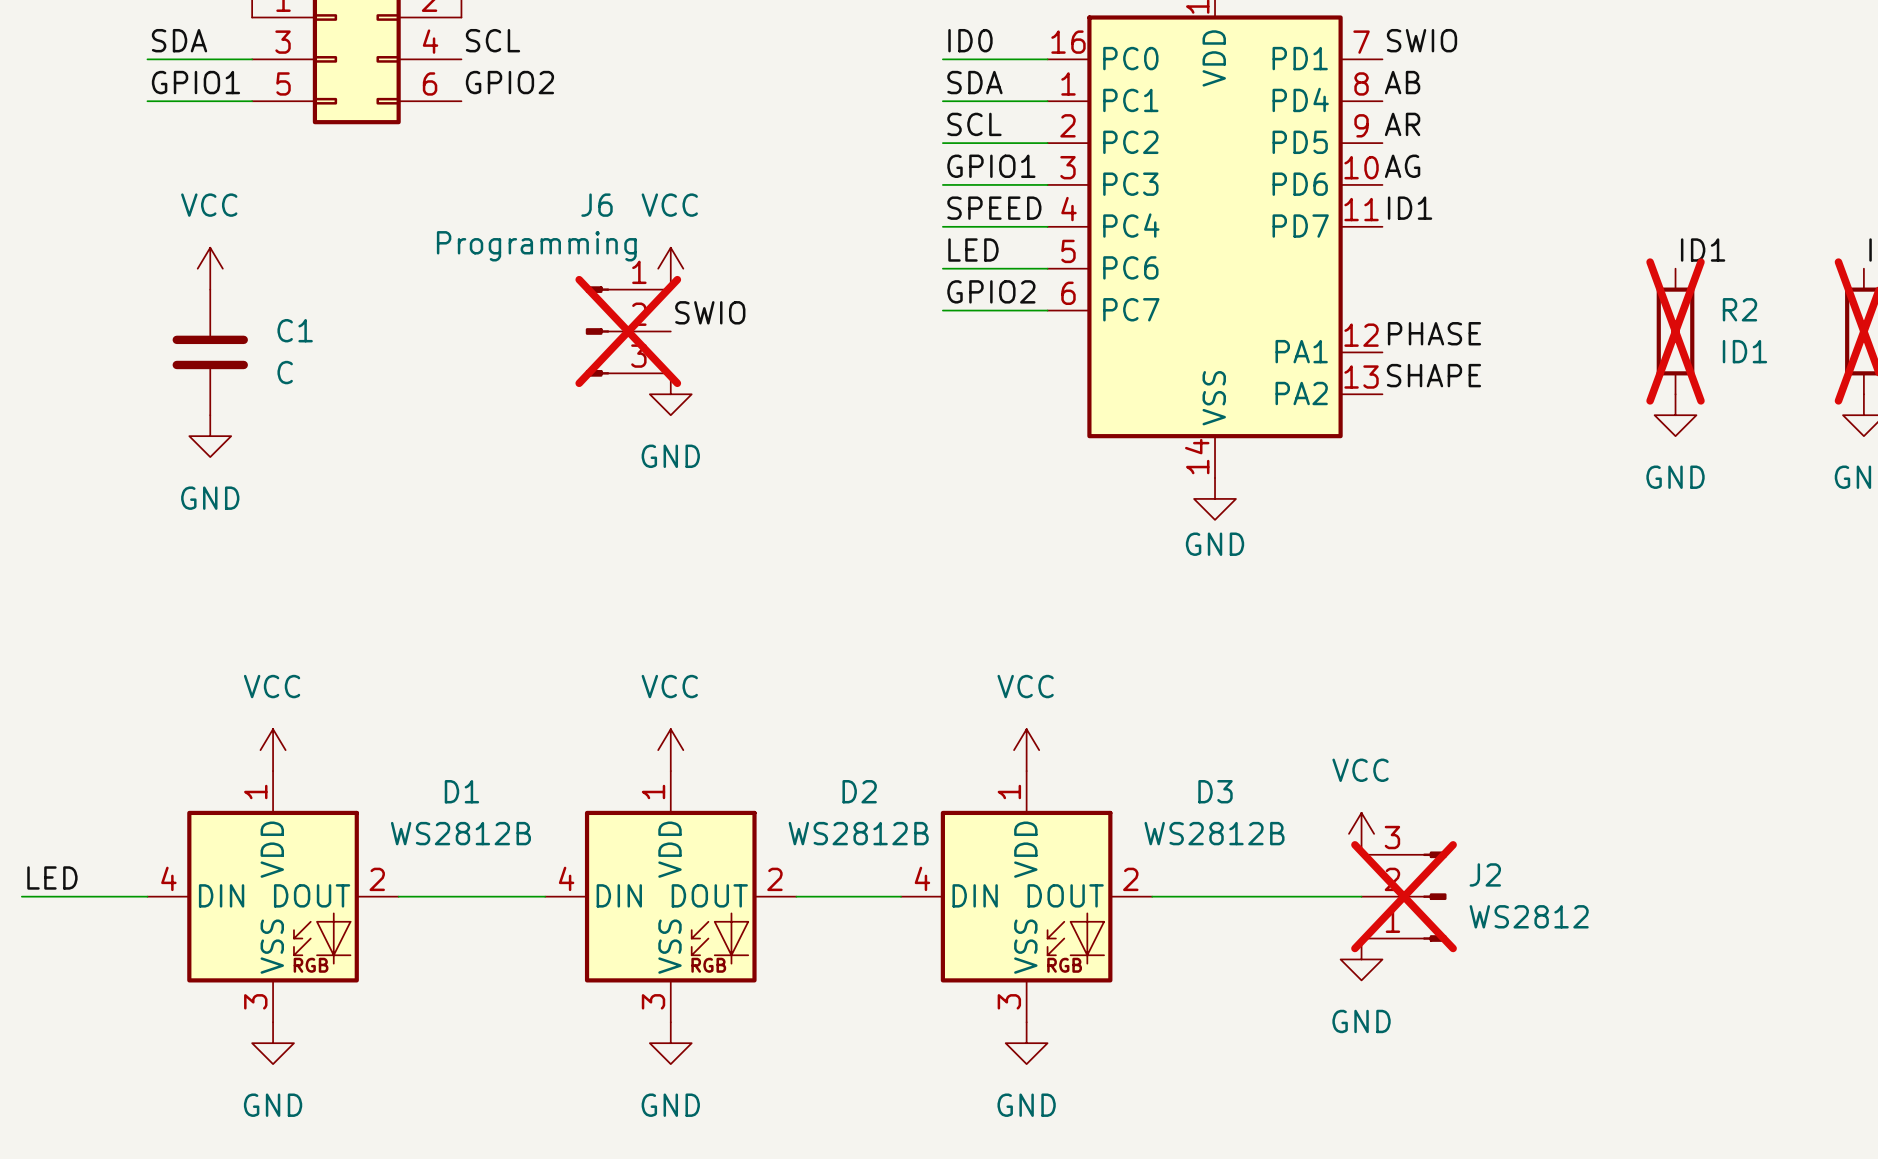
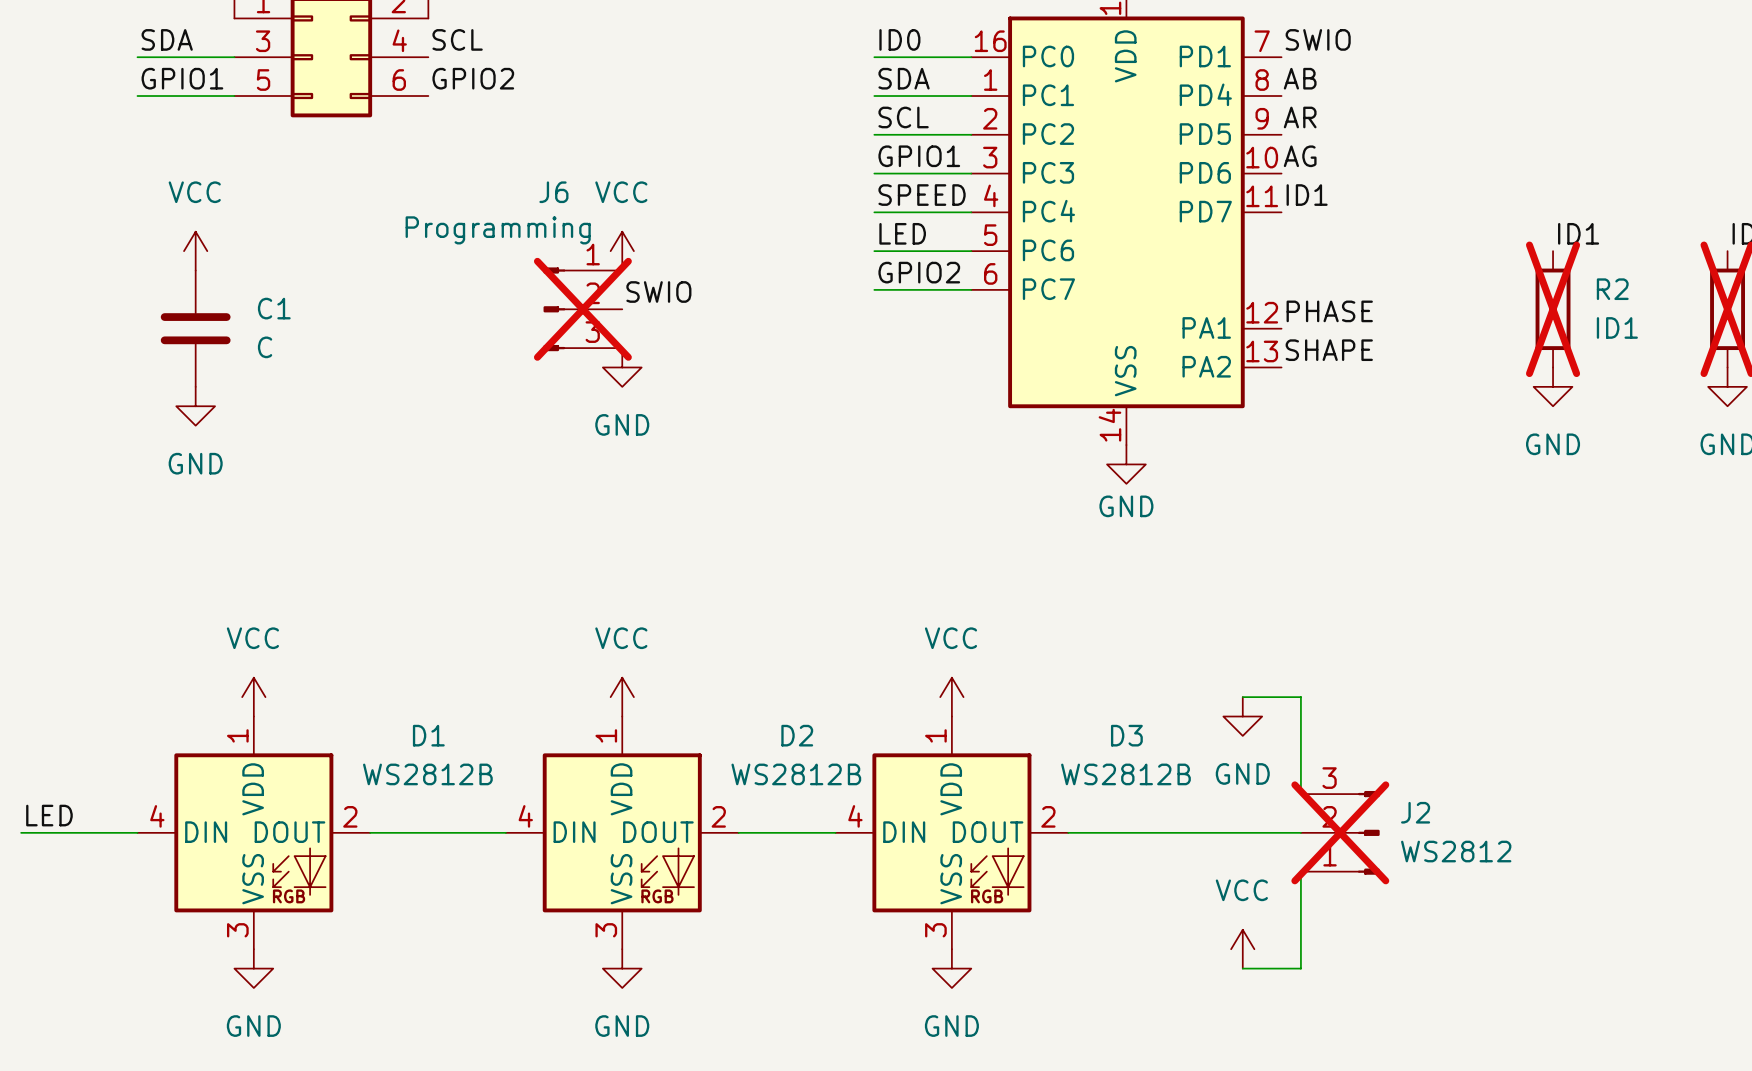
wire: none -> (1242, 697) (1300, 697) (1300, 794)
power symbol position: VCC (1361, 833) -> VCC (1242, 949)
J2 position: (1404, 896) -> (1340, 832)
wire: none -> (1300, 871) (1300, 968) (1242, 968)
power symbol position: GND (1361, 959) -> GND (1242, 716)

